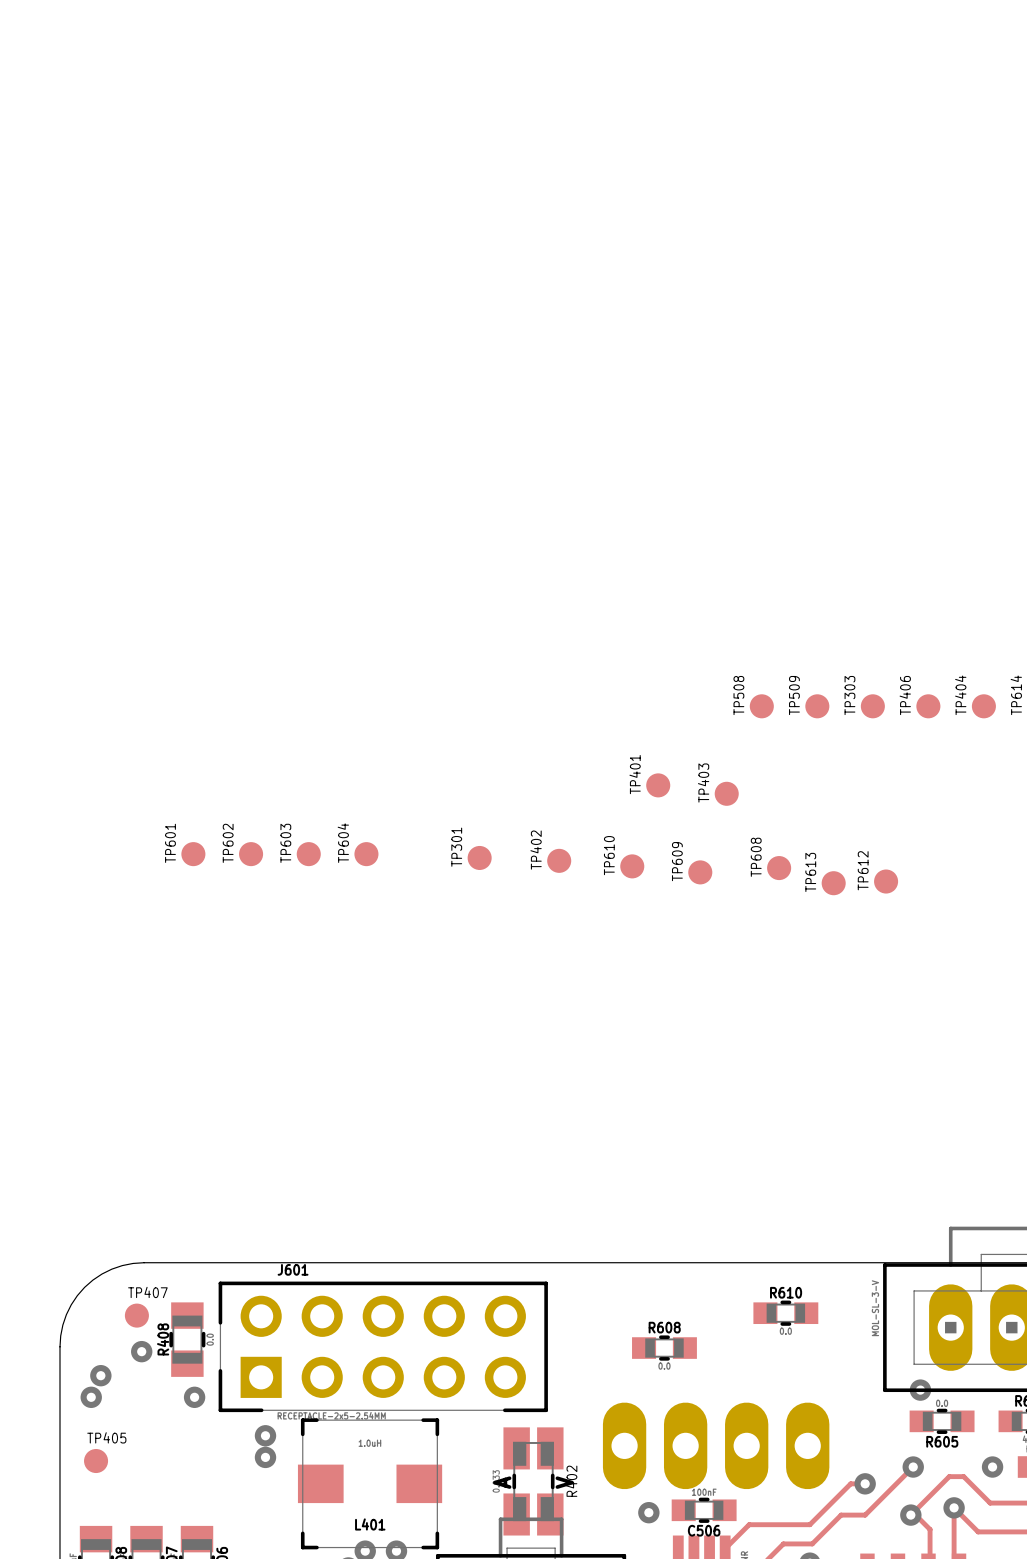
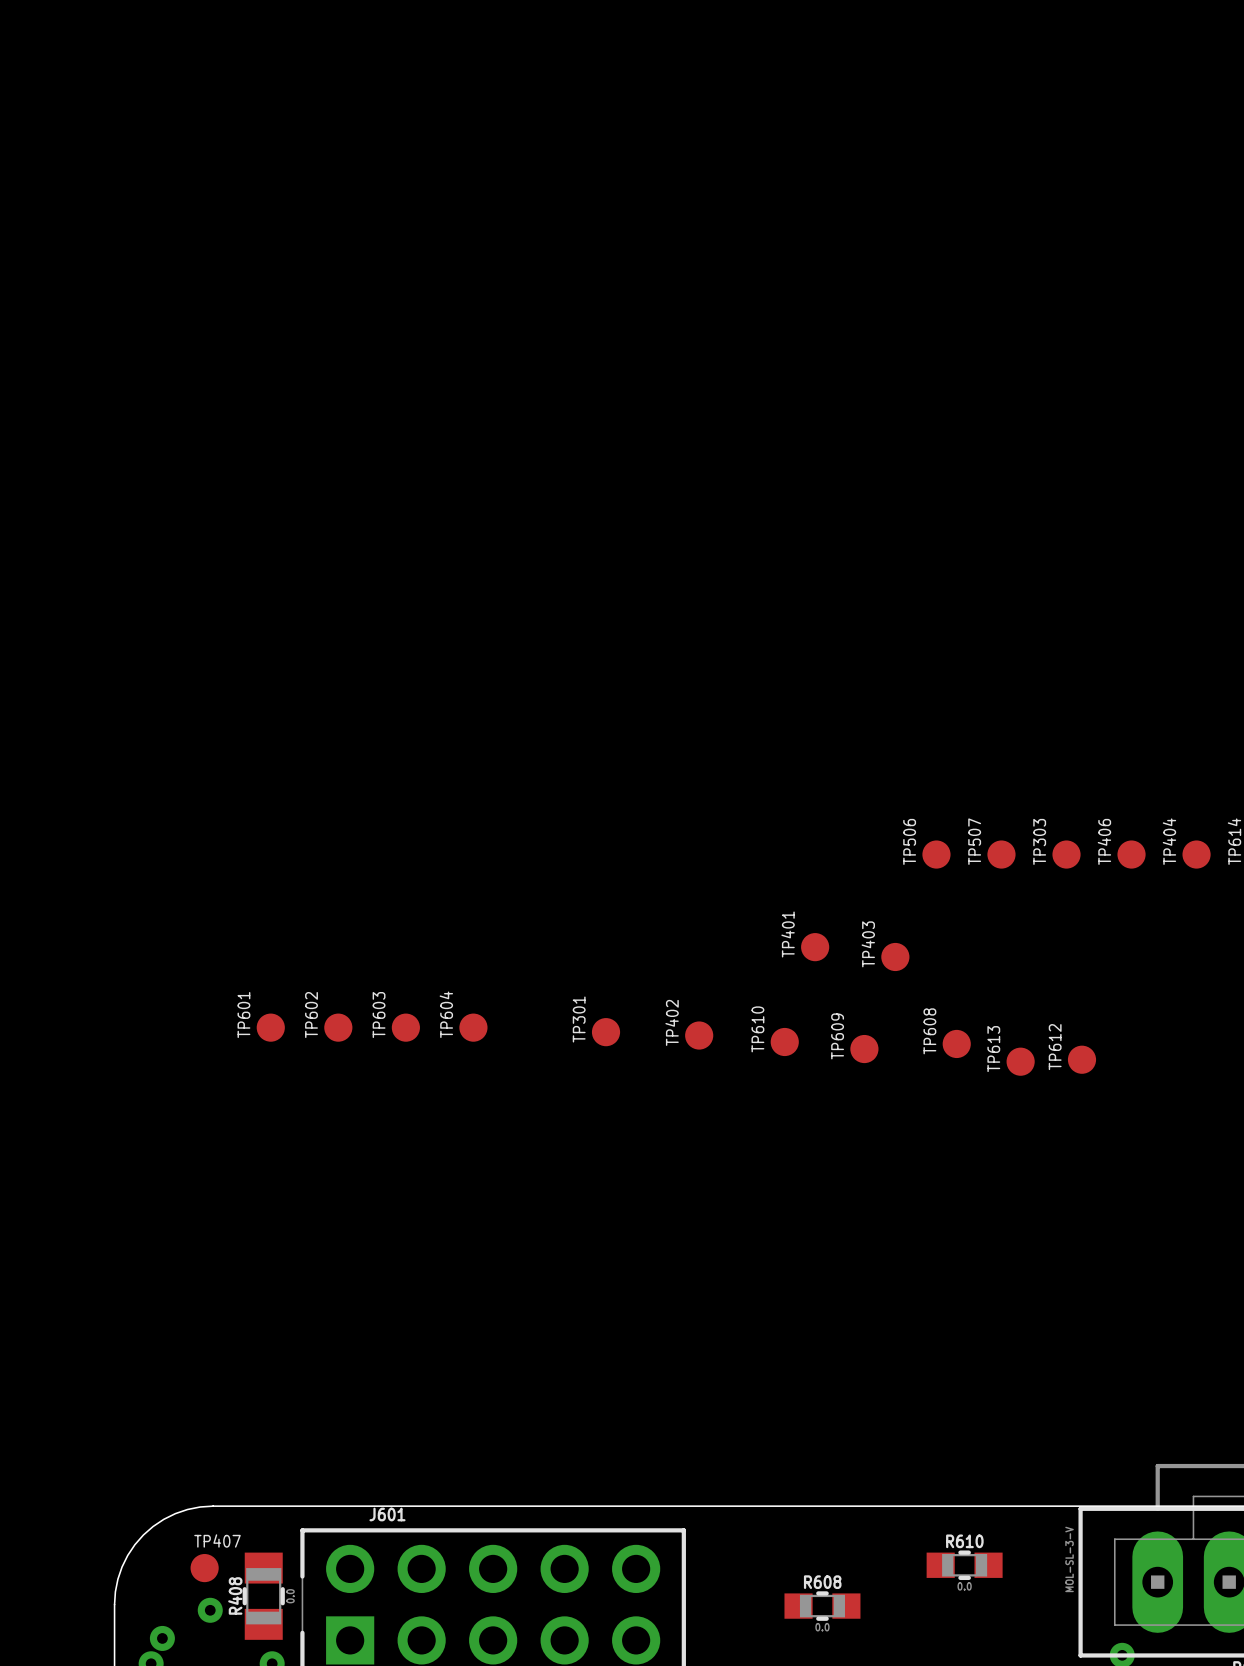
TP508 name: TP508 (738, 695) -> TP506 (909, 841)
TP509 name: TP509 (794, 695) -> TP507 (974, 841)

